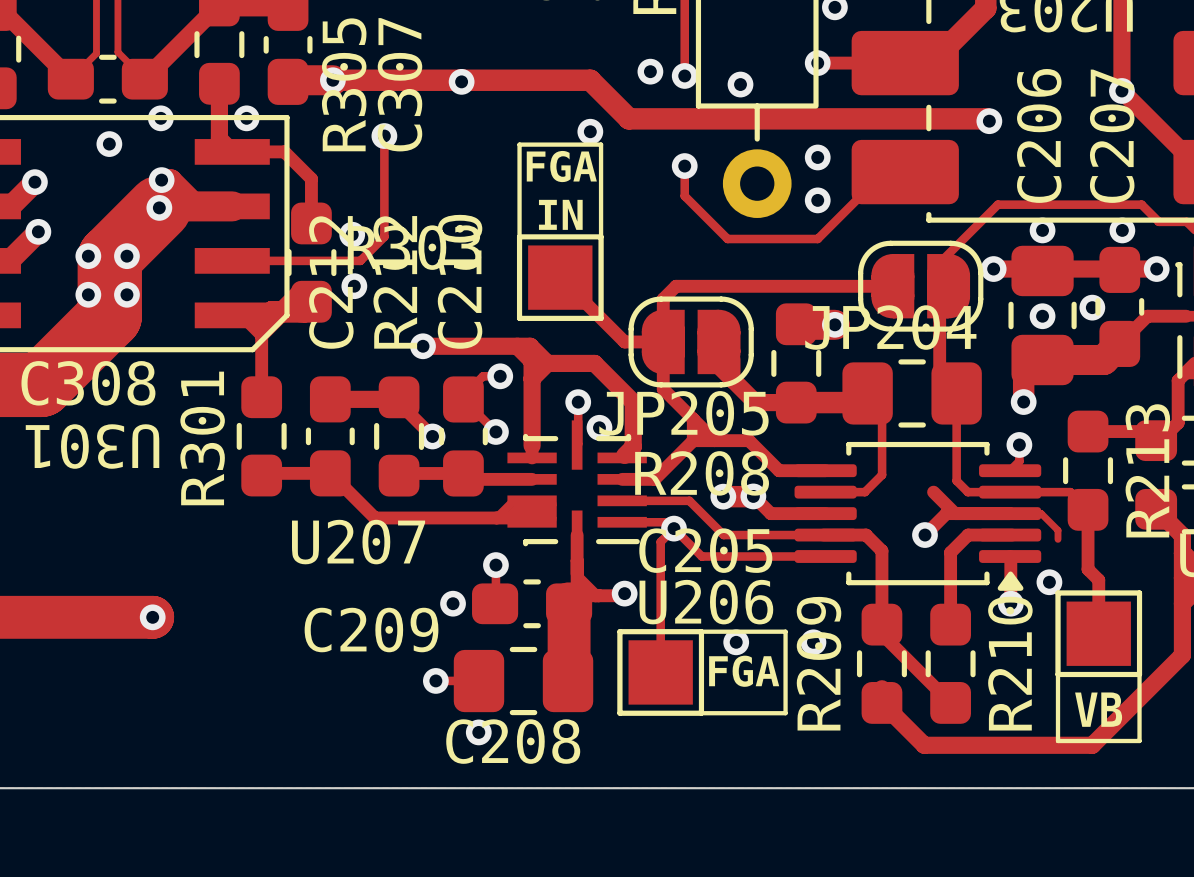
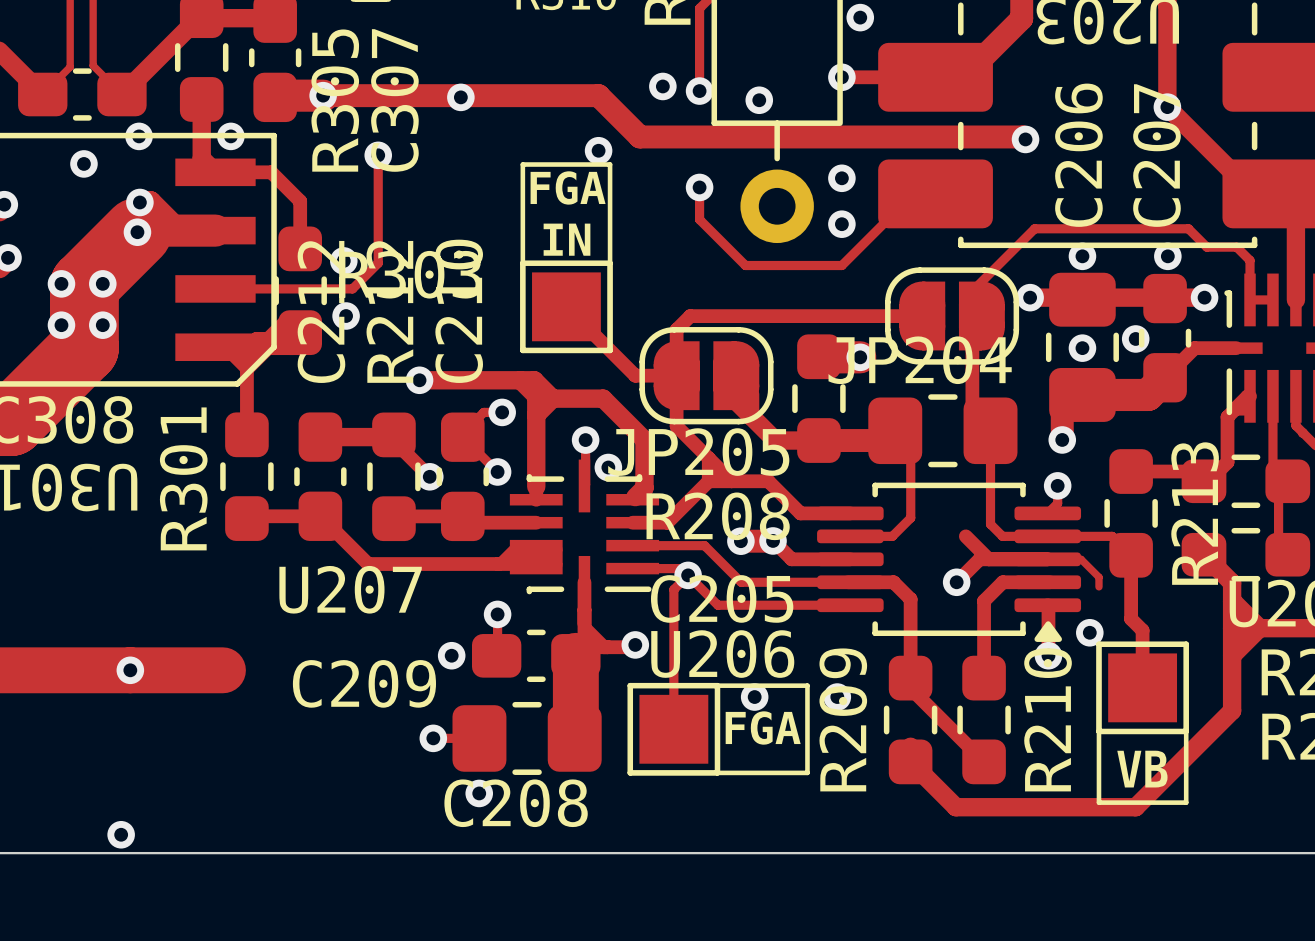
track: none -> (130, 670) (222, 670)
via: none -> (121, 834)

